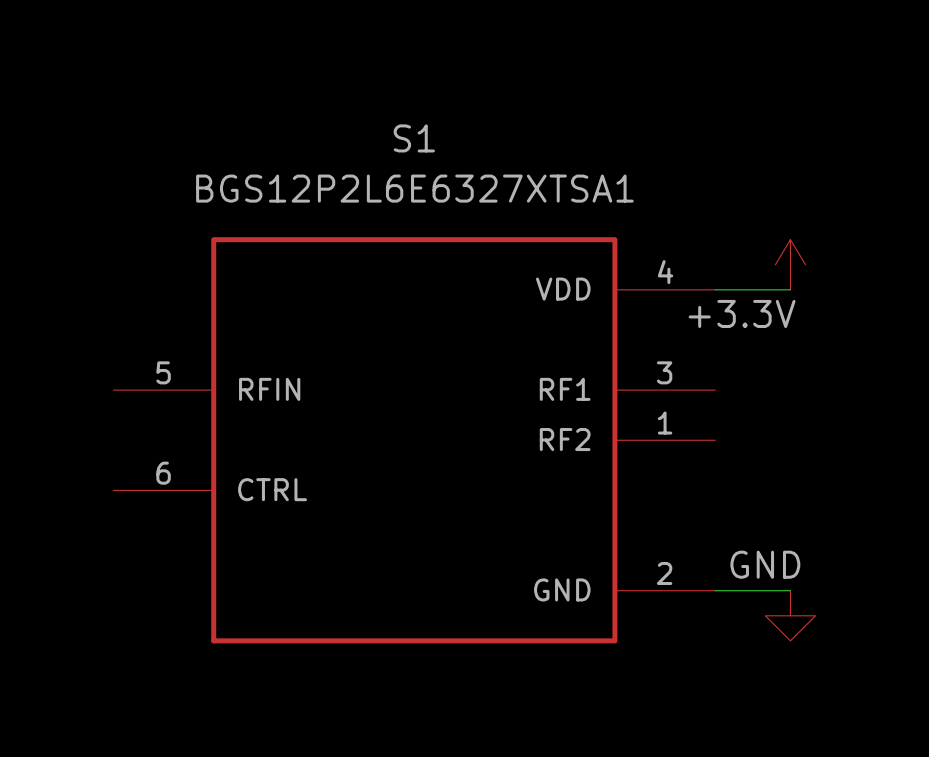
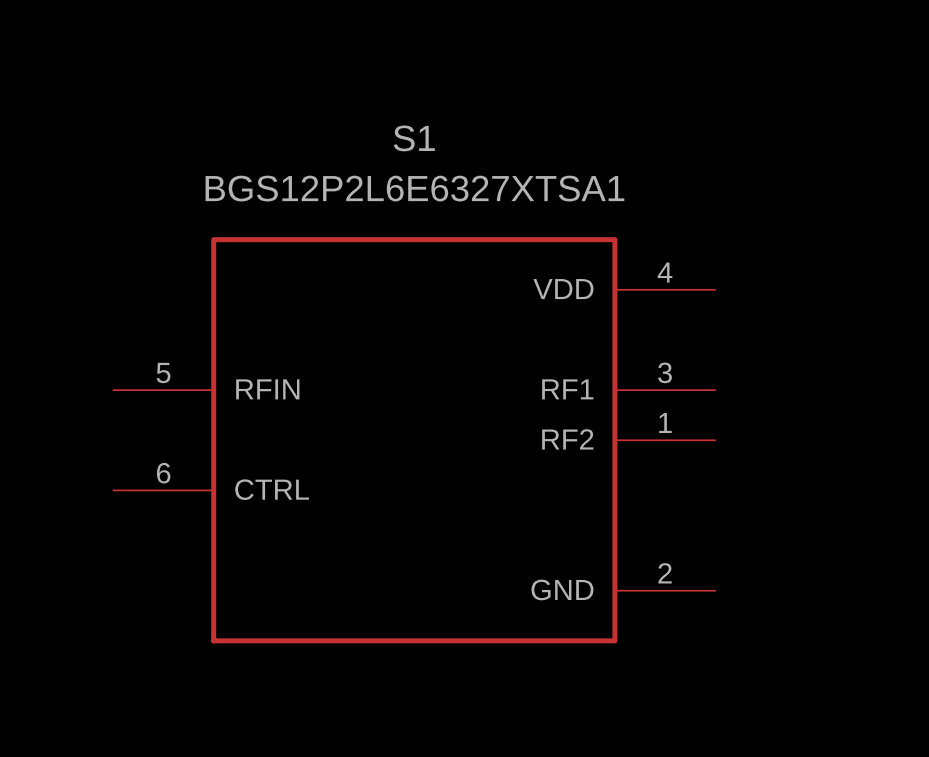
power symbol: +3.3V (790, 264) -> none
wire: (715, 289) (790, 289) -> none
wire: (715, 590) (790, 590) -> none
power symbol: GND (790, 615) -> none

